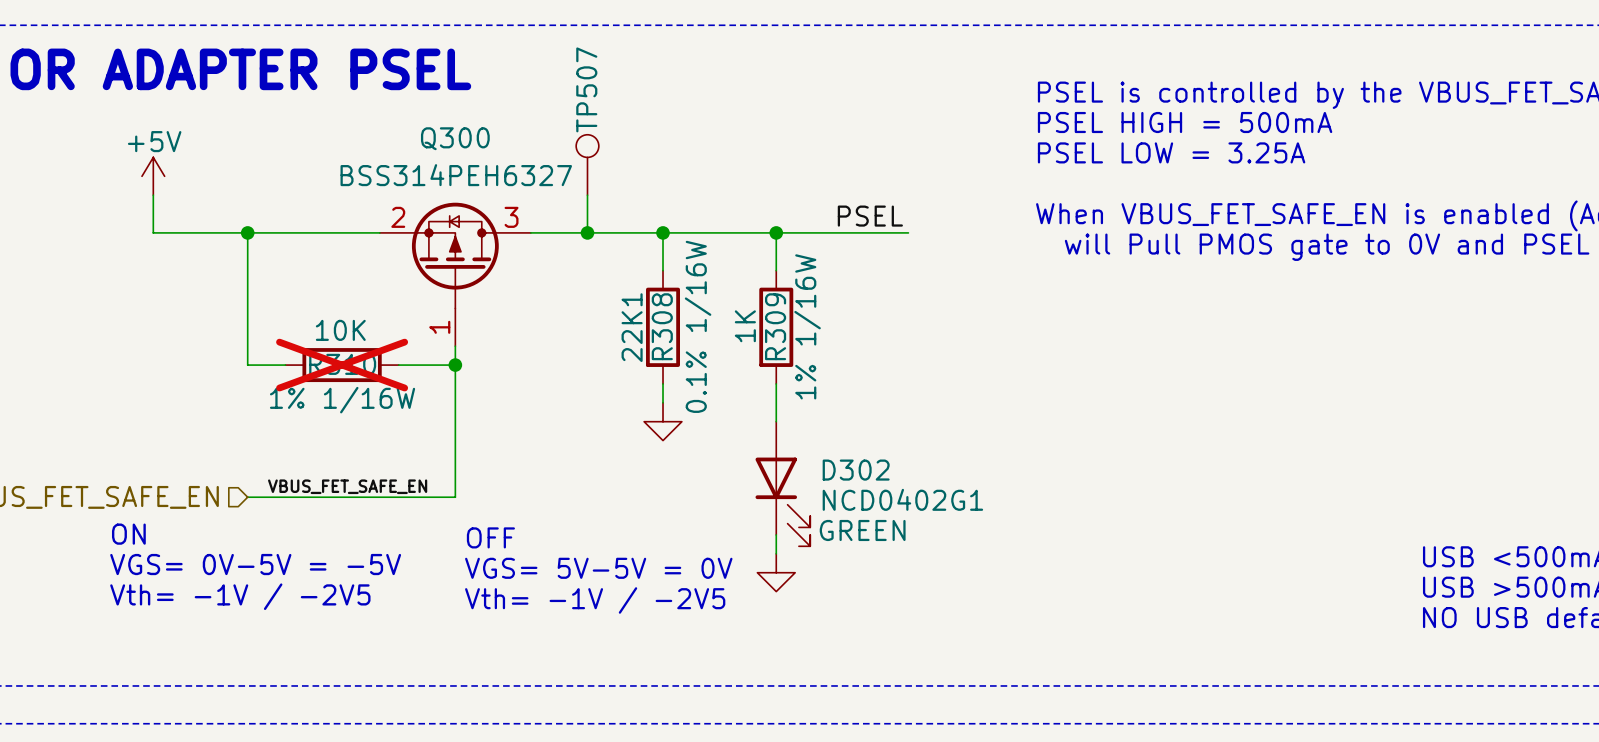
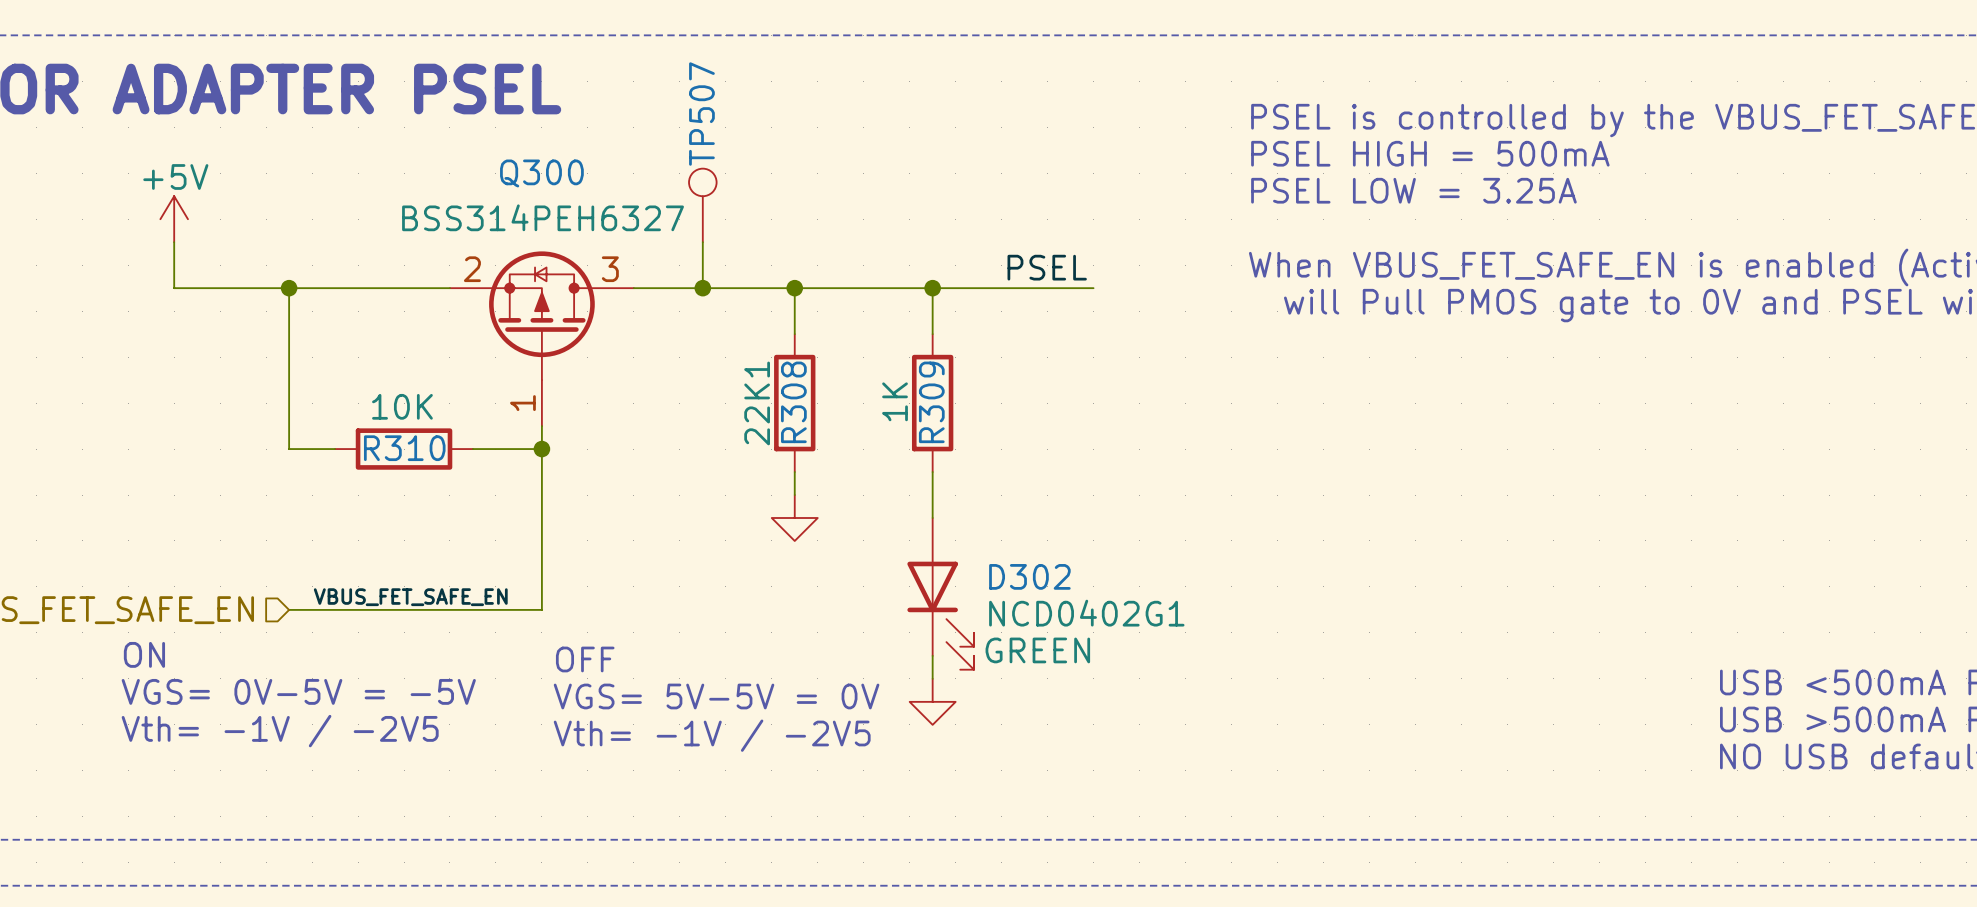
R308 text: 0.1% 1/16W (698, 326) -> none
R309 text: 1% 1/16W (807, 326) -> none
R310 do-not-place cross: (342, 365) -> none
R310 text: 1% 1/16W (342, 400) -> none

